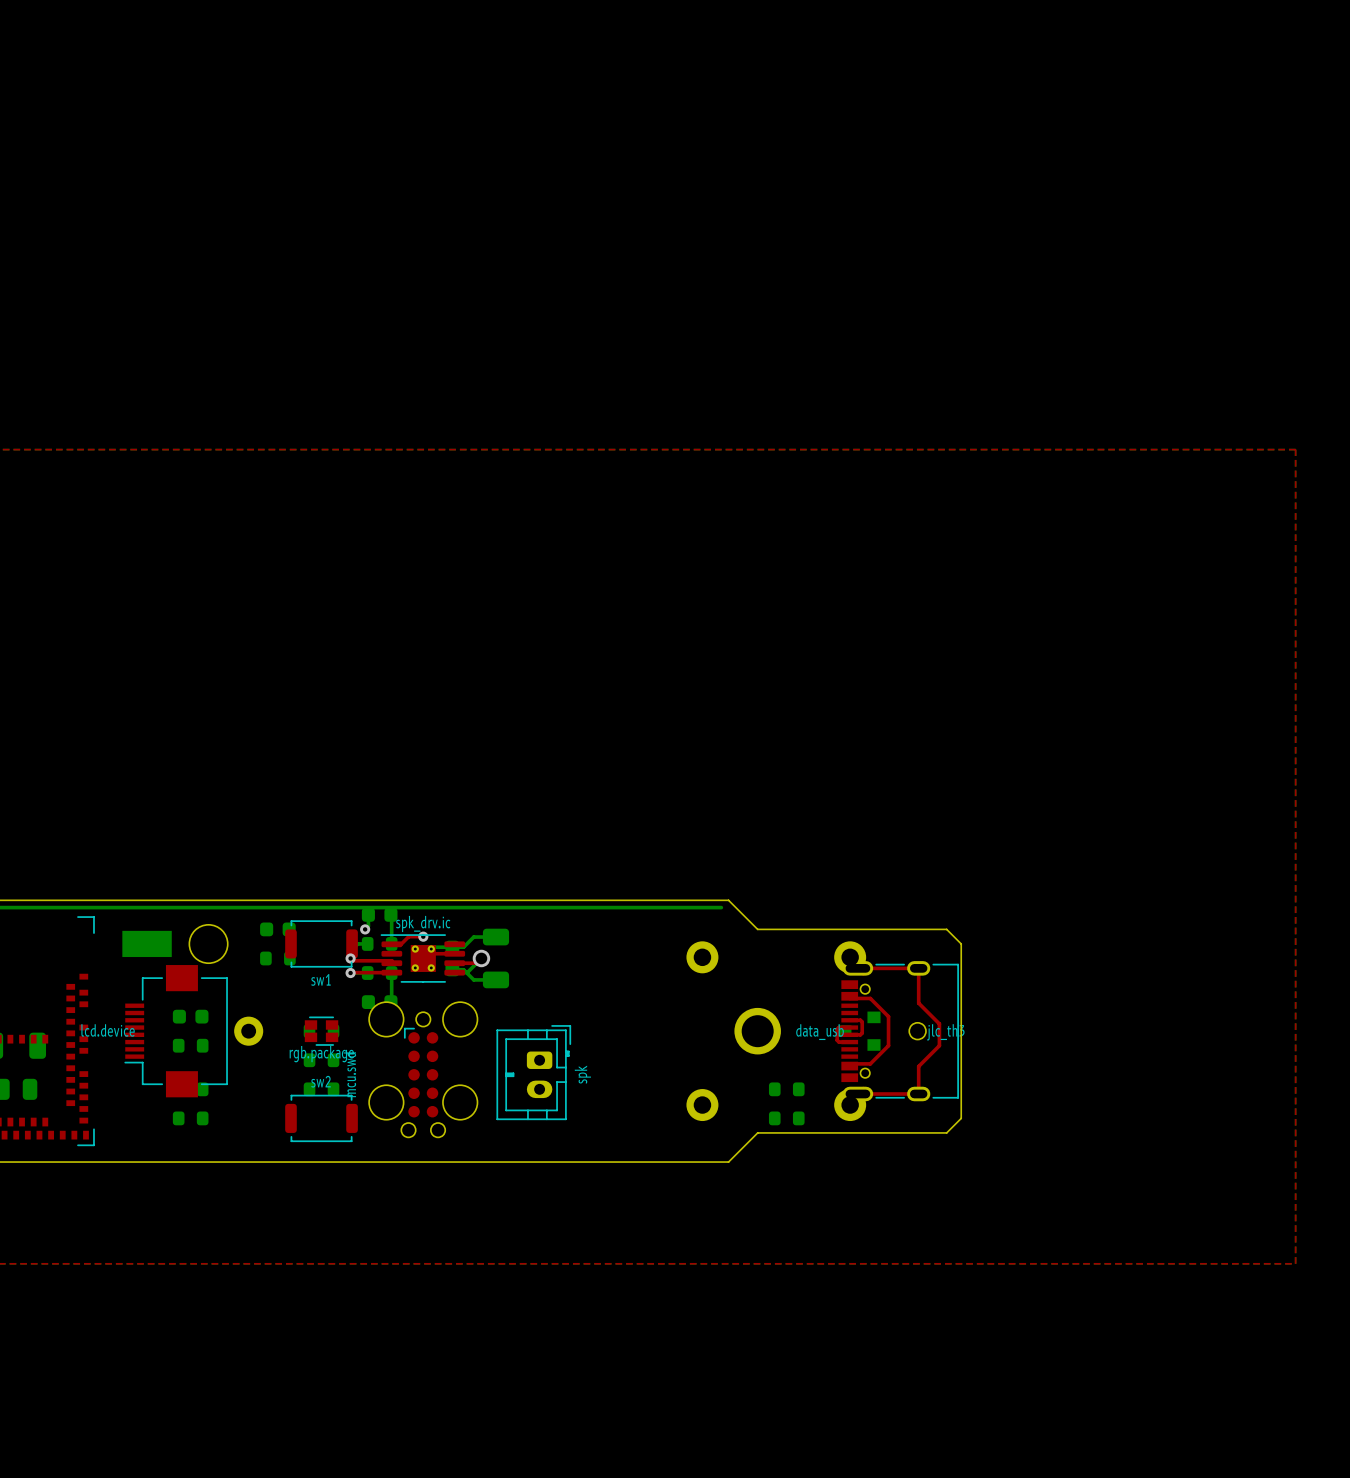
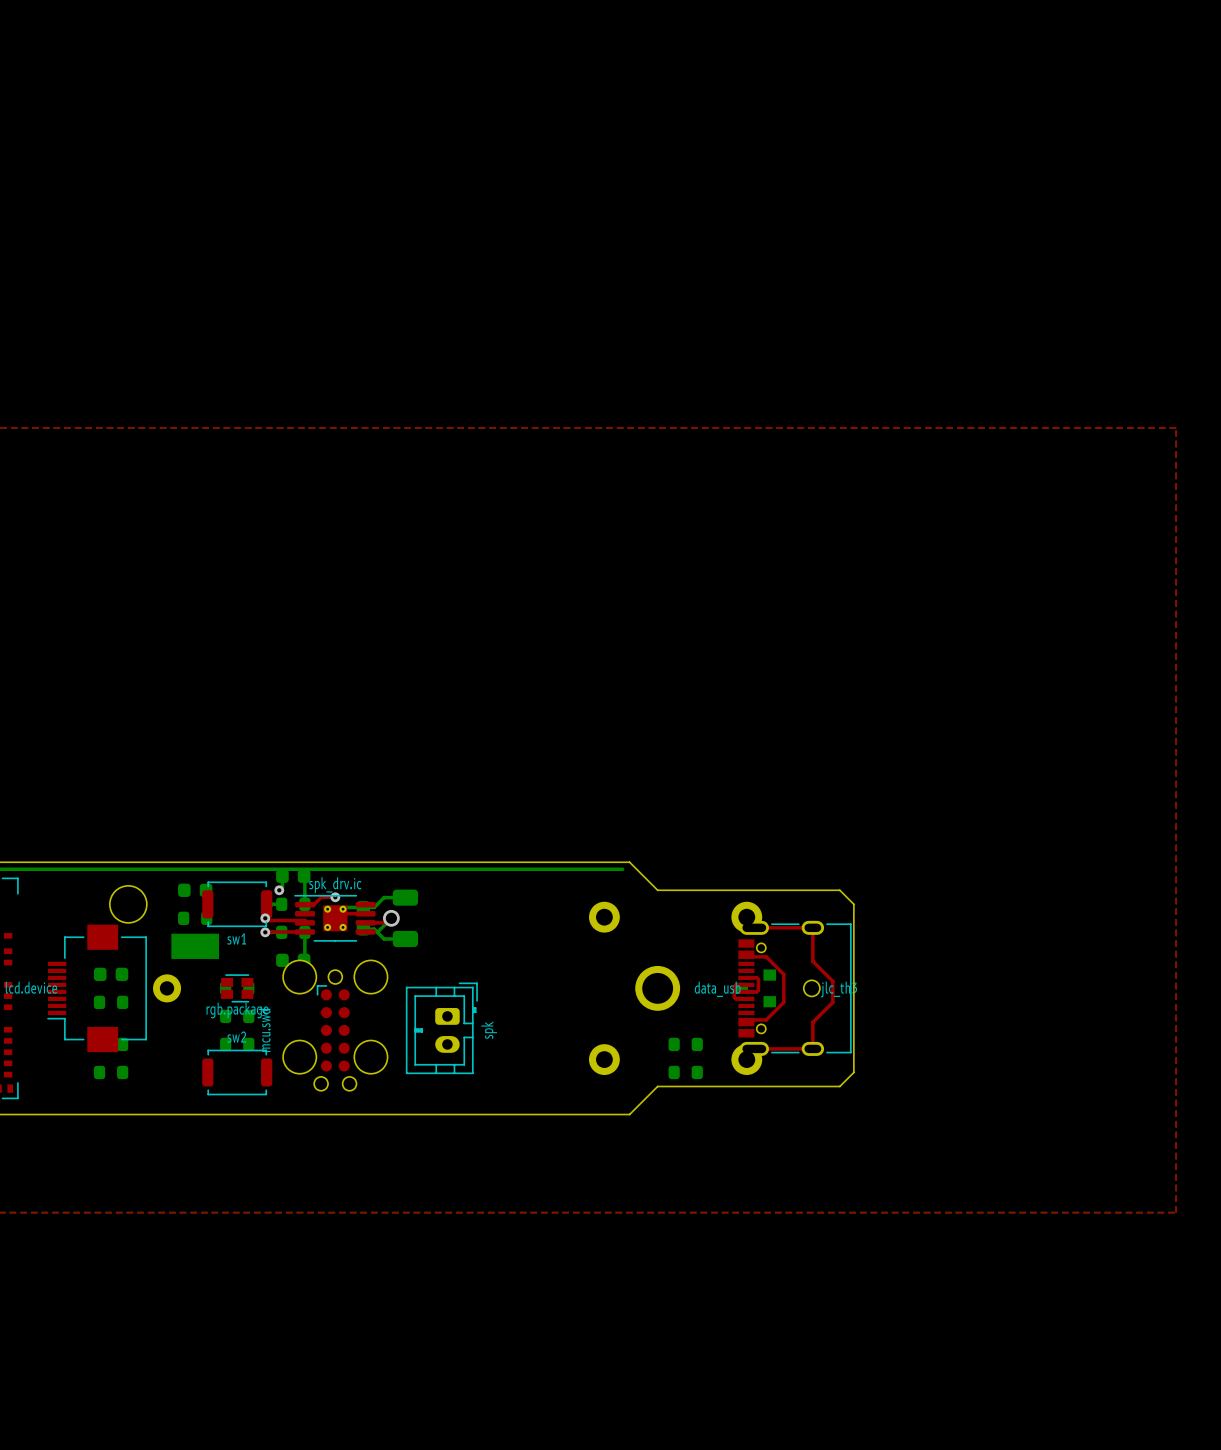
part position: (147, 943) -> (195, 946)

